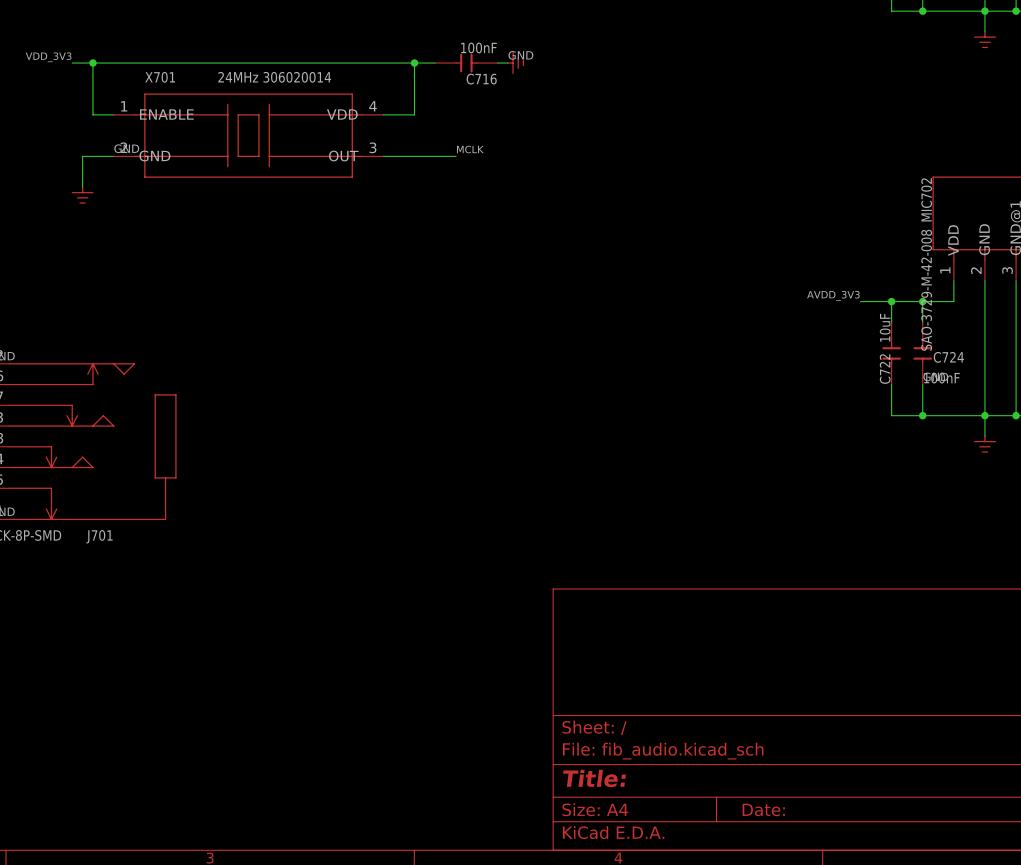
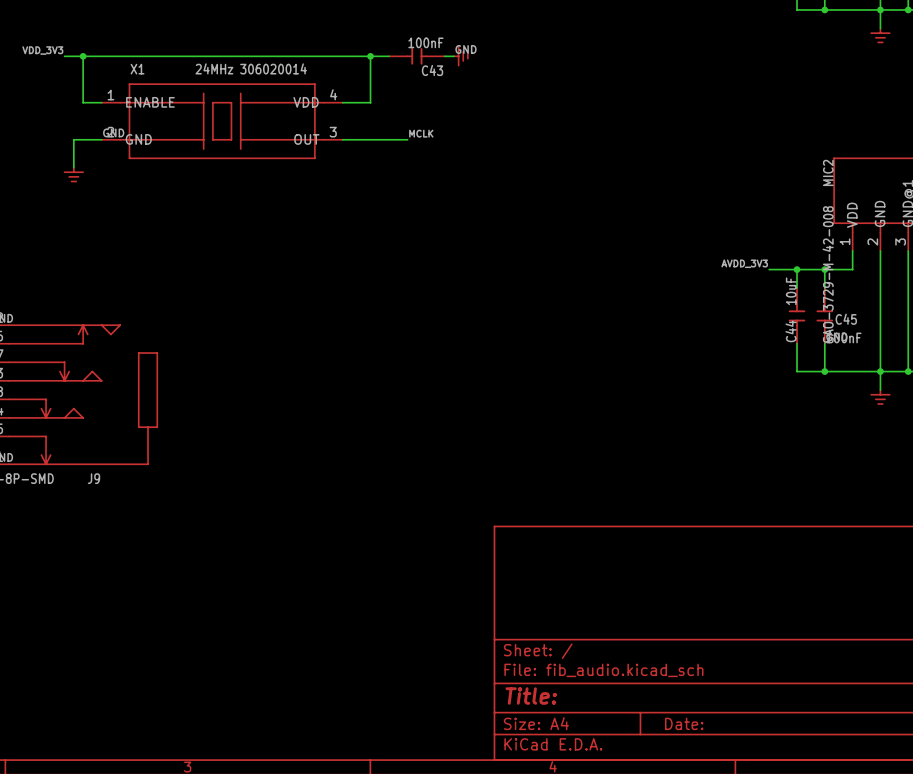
X701 name: X701 (160, 77) -> X1 (137, 69)
C716 name: C716 (481, 79) -> C43 (432, 70)
MIC702 name: MIC702 (926, 199) -> MIC2 (828, 172)
C724 name: C724 (948, 357) -> C45 (846, 319)
C722 name: C722 (885, 369) -> C44 (791, 331)
J701 name: J701 (99, 536) -> J9 (93, 478)

